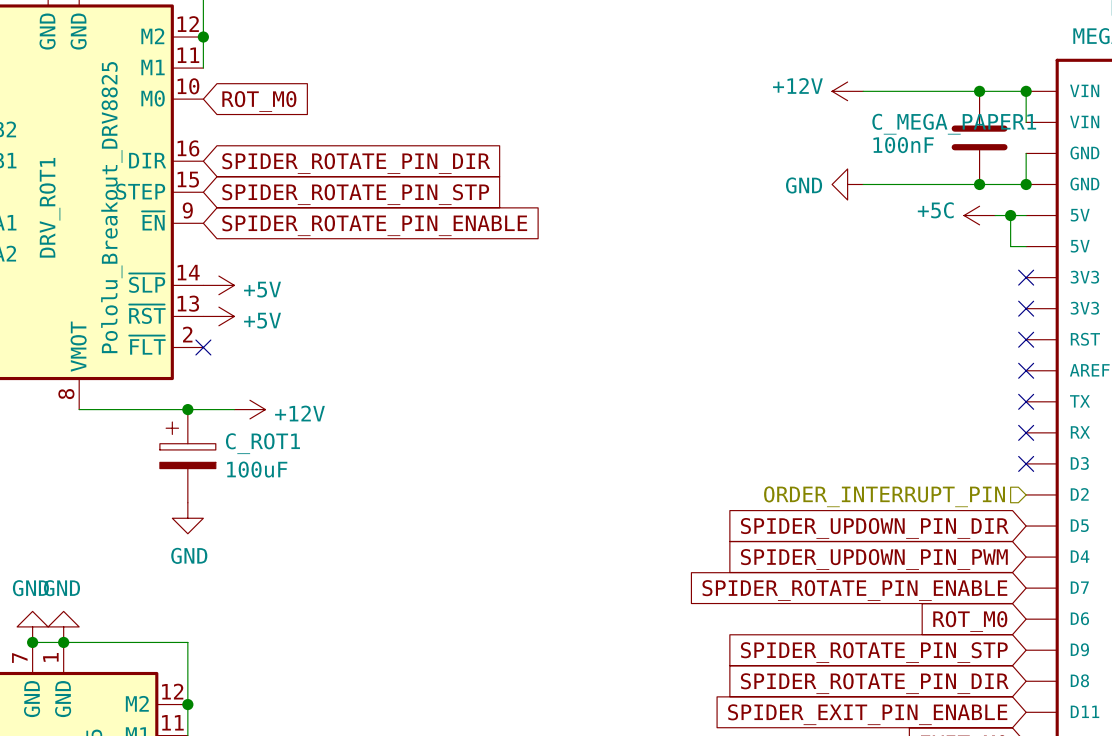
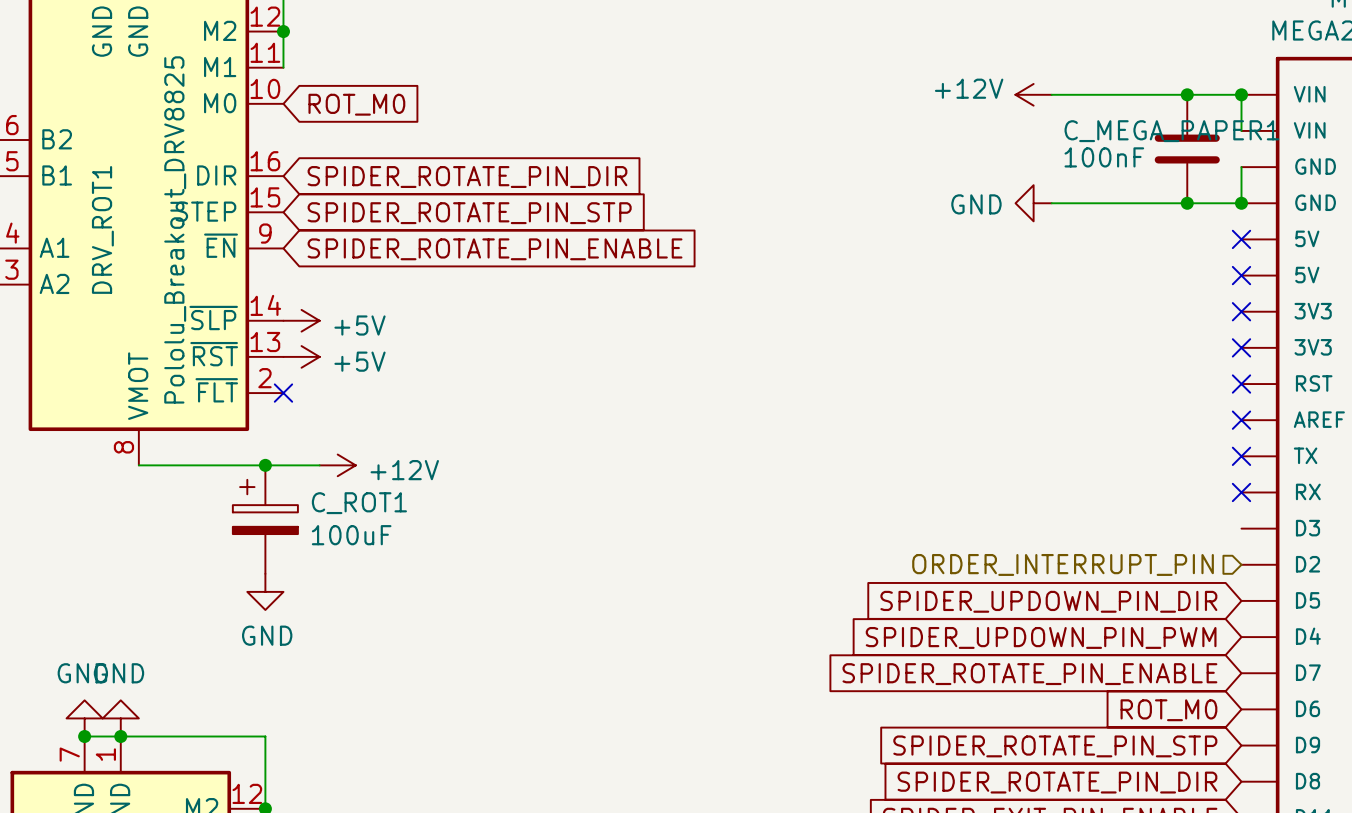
power symbol: +5C (979, 215) -> none
wire: (995, 215) (1026, 215) -> none
wire: (1010, 215) (1010, 246) (1026, 246) -> none
junction: (1010, 215) -> none
no-connect mark: none -> (1241, 239)
no-connect mark: none -> (1241, 275)
no-connect mark: (1026, 463) -> none

